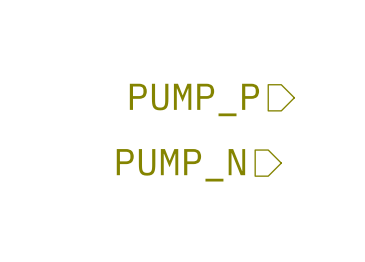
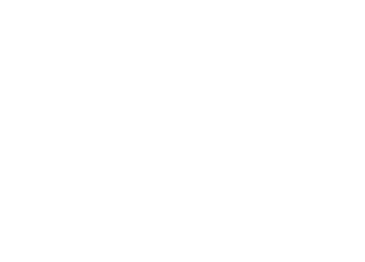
hierarchical label: PUMP_P (194, 99) -> none
hierarchical label: PUMP_N (180, 165) -> none

